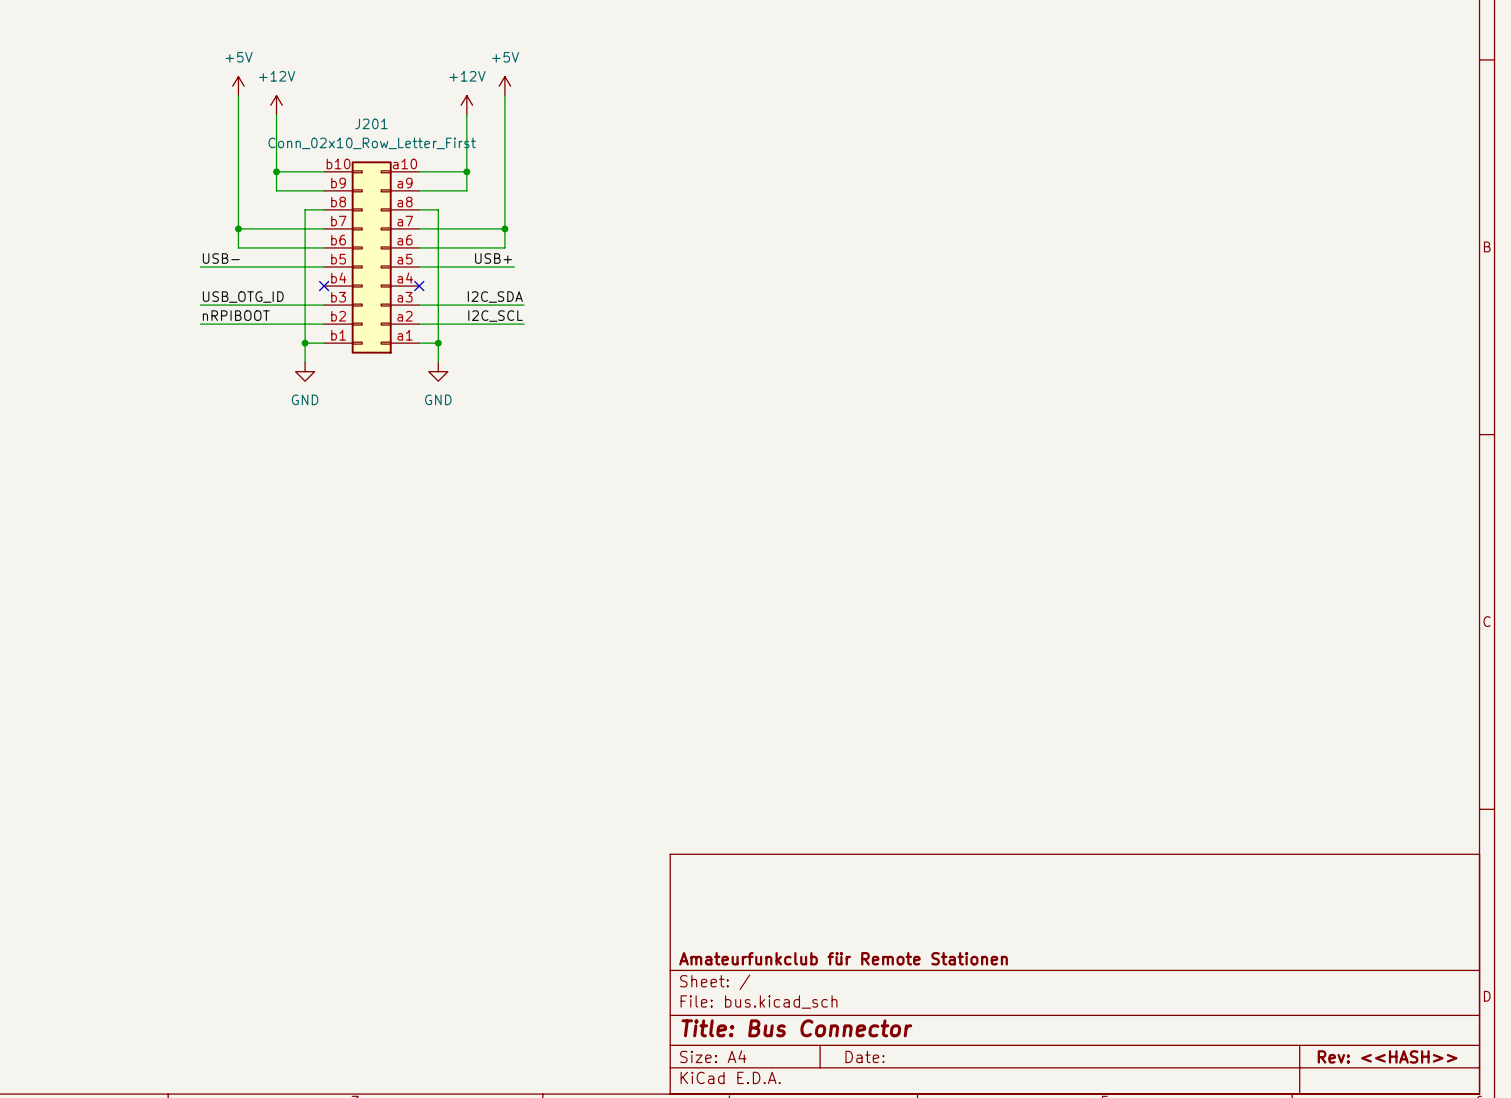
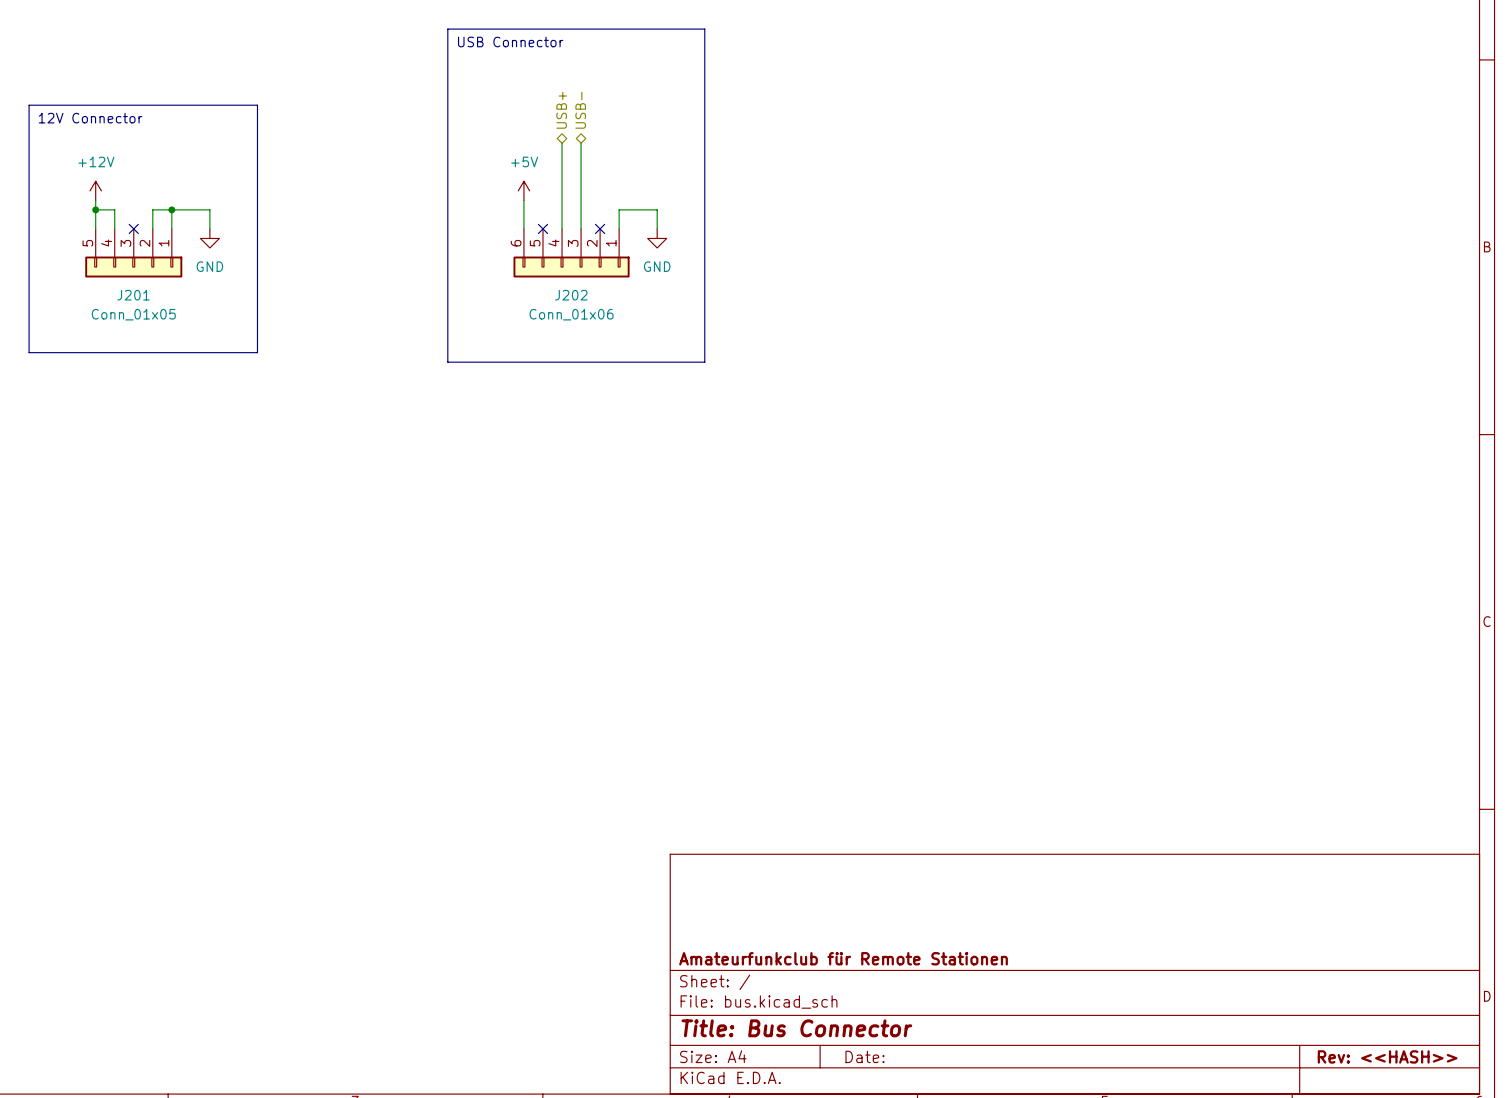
line: none -> (447, 29) (704, 29) (704, 362) (447, 362) (447, 29)
text: none -> USB Connector (510, 42)
power symbol: +5V (238, 86) -> none
power symbol position: +5V (504, 86) -> +5V (523, 190)
wire: (238, 95) (238, 247) (324, 247) -> none
wire: (504, 95) (504, 247) (419, 247) -> none
line: none -> (29, 105) (257, 105) (257, 352) (29, 352) (29, 105)
power symbol: +12V (276, 105) -> none
power symbol: +12V (466, 105) -> none
hierarchical label: none -> USB+ (561, 110)
hierarchical label: none -> USB- (580, 110)
wire: (276, 114) (276, 190) (324, 190) -> none
wire: (466, 114) (466, 190) (419, 190) -> none
text: none -> 12V Connector (90, 118)
J201 name position: J201 (371, 123) -> J201 (133, 295)
J201 value: Conn_02x10_Row_Letter_First (372, 143) -> Conn_01x05 (133, 314)
wire: none -> (562, 143) (562, 228)
wire: none -> (581, 143) (581, 228)
J201 symbol: [324, 161, 420, 354] -> [85, 228, 183, 278]
wire: (276, 171) (324, 171) -> none
junction: (276, 171) -> none
wire: (419, 171) (466, 171) -> none
junction: (466, 171) -> none
power symbol: none -> +12V (95, 190)
wire: none -> (95, 200) (95, 228)
wire: none -> (523, 200) (523, 228)
wire: none -> (95, 209) (114, 209) (114, 228)
junction: none -> (95, 209)
wire: none -> (171, 209) (171, 228)
junction: none -> (171, 209)
wire: (324, 209) (305, 209) (305, 362) -> none
wire: (419, 209) (438, 209) (438, 362) -> none
no-connect mark: none -> (133, 228)
wire: none -> (152, 228) (152, 209) (209, 209) (209, 228)
wire: (238, 228) (324, 228) -> none
junction: (238, 228) -> none
wire: (419, 228) (504, 228) -> none
junction: (504, 228) -> none
no-connect mark: none -> (542, 228)
no-connect mark: none -> (600, 228)
wire: none -> (619, 228) (619, 209) (657, 209) (657, 228)
power symbol: none -> GND (209, 238)
power symbol: none -> GND (657, 238)
J202: none -> Conn_01x06 (571, 253)
label: USB- (221, 258) -> none
label: USB+ (493, 258) -> none
wire: (200, 267) (324, 267) -> none
wire: (419, 267) (514, 267) -> none
no-connect mark: (324, 286) -> none
no-connect mark: (419, 286) -> none
label: USB_OTG_ID (243, 297) -> none
label: I2C_SDA (495, 297) -> none
wire: (200, 305) (324, 305) -> none
wire: (419, 305) (523, 305) -> none
label: nRPIBOOT (236, 315) -> none
label: I2C_SCL (495, 316) -> none
wire: (200, 324) (324, 324) -> none
wire: (419, 324) (523, 324) -> none
wire: (305, 343) (324, 343) -> none
junction: (305, 343) -> none
wire: (419, 343) (438, 343) -> none
junction: (438, 343) -> none
power symbol: GND (305, 371) -> none
power symbol: GND (438, 371) -> none

